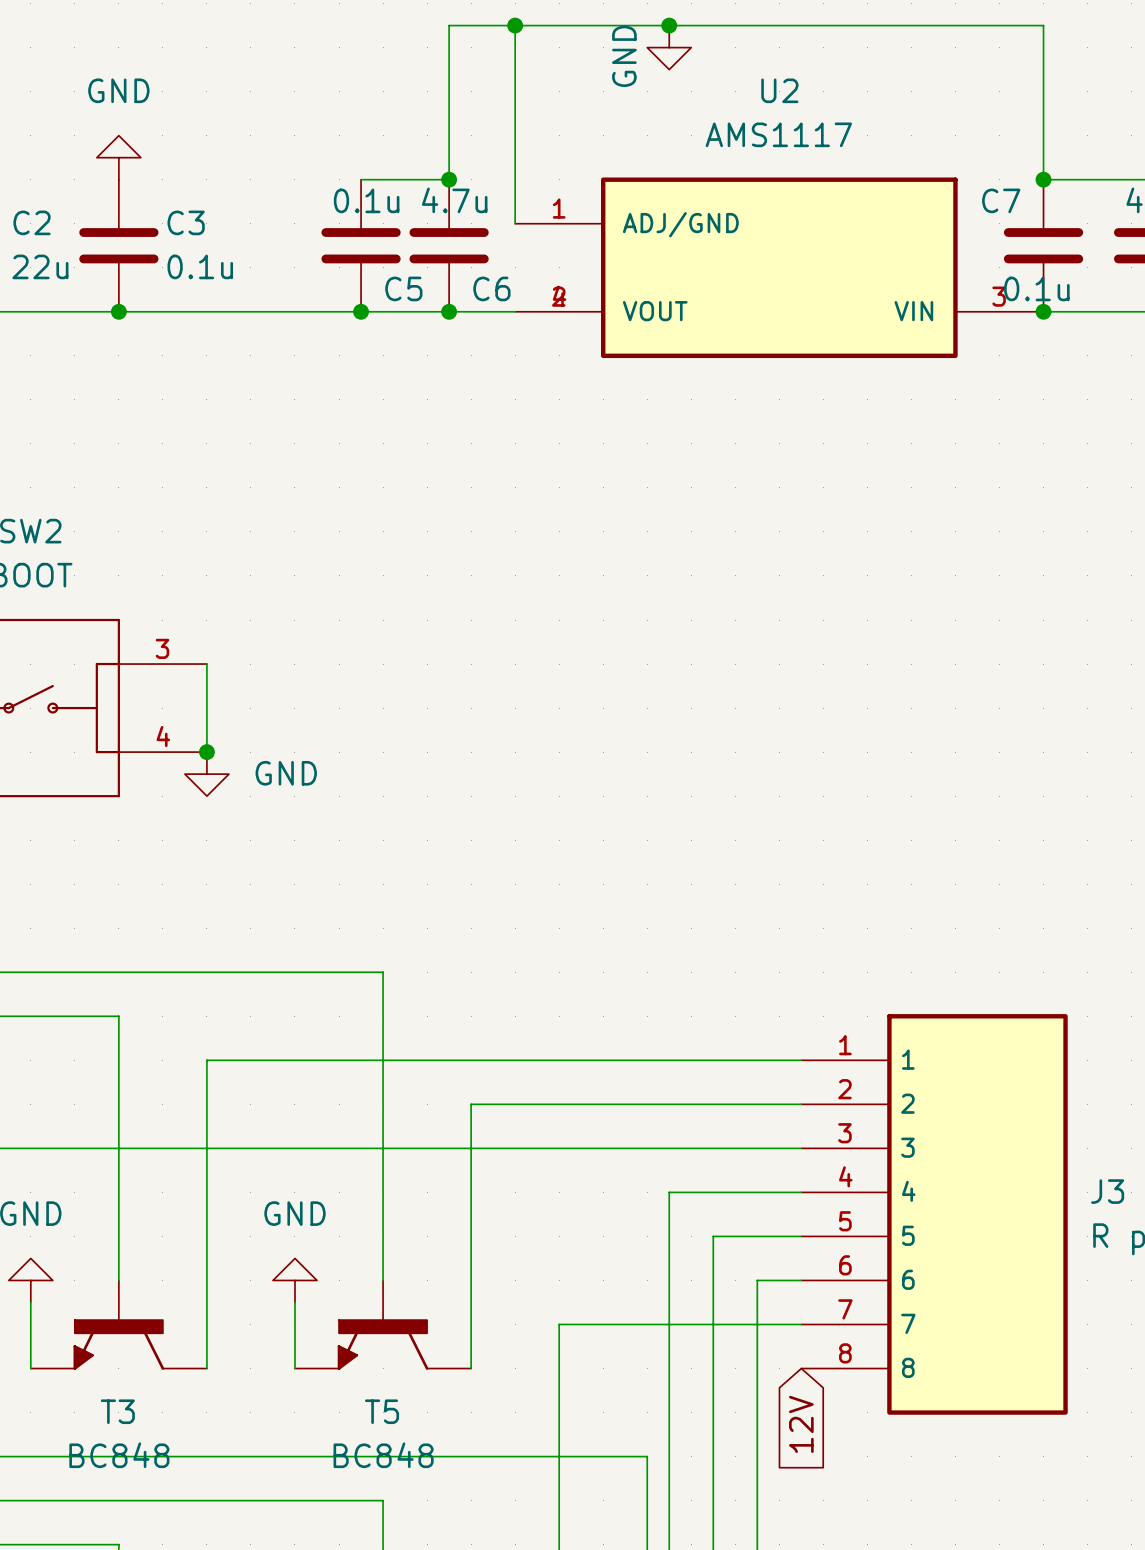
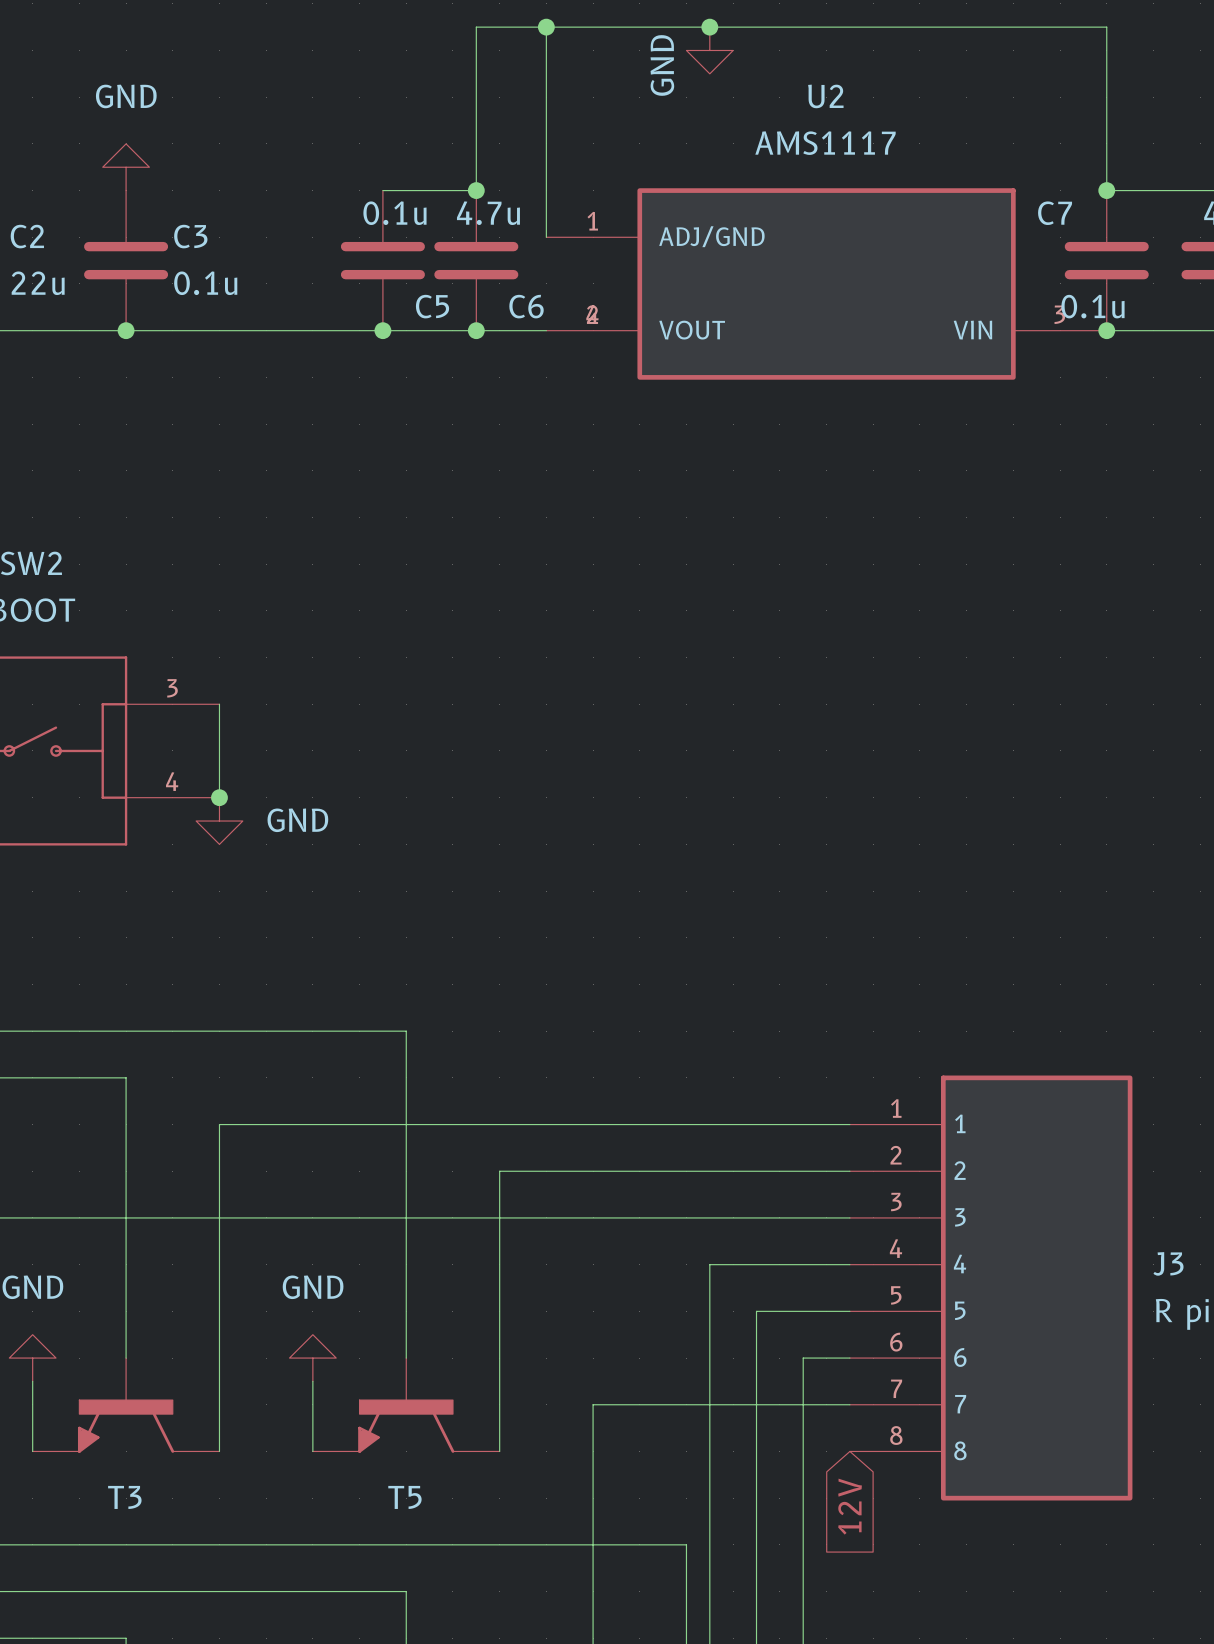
T3 value: BC848 (119, 1455) -> none
T5 value: BC848 (383, 1455) -> none

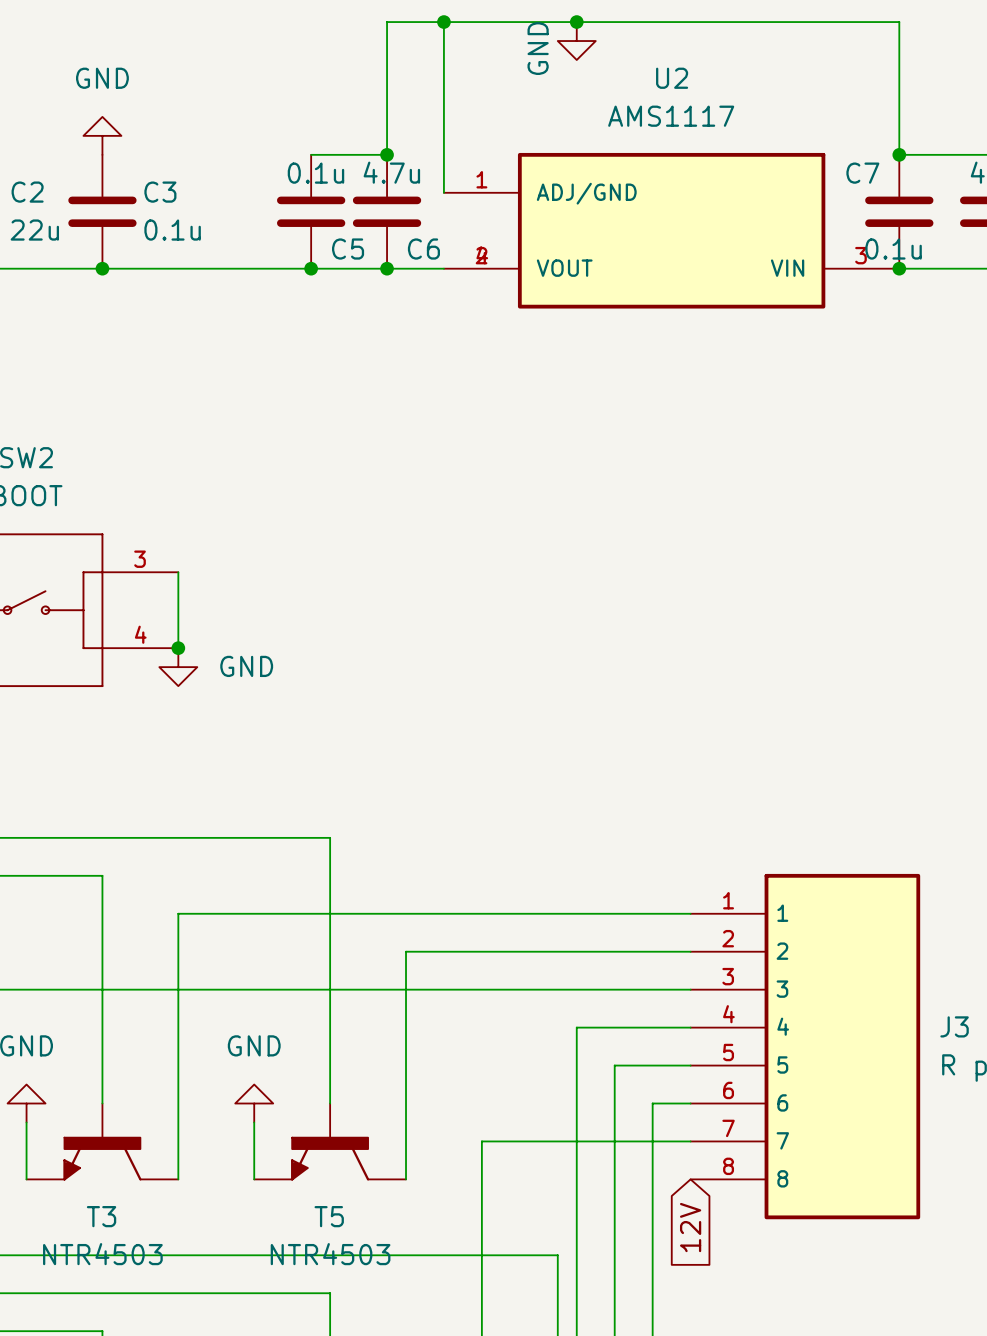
T3 value: none -> NTR4503 (102, 1254)
T5 value: none -> NTR4503 (330, 1254)

